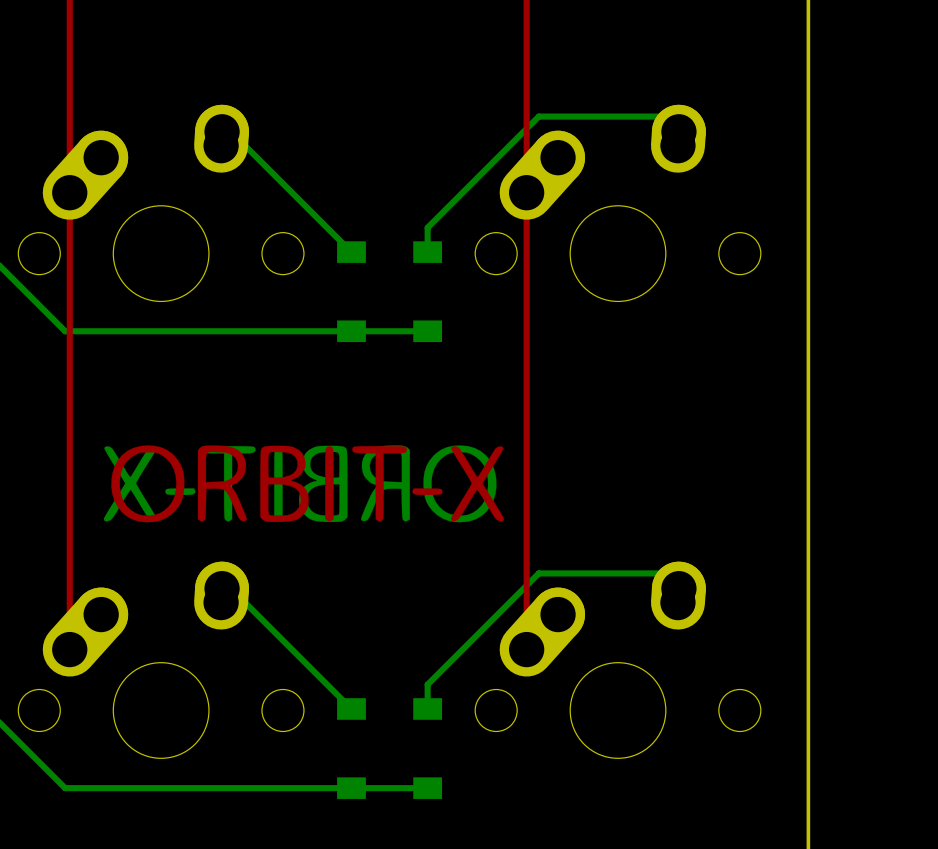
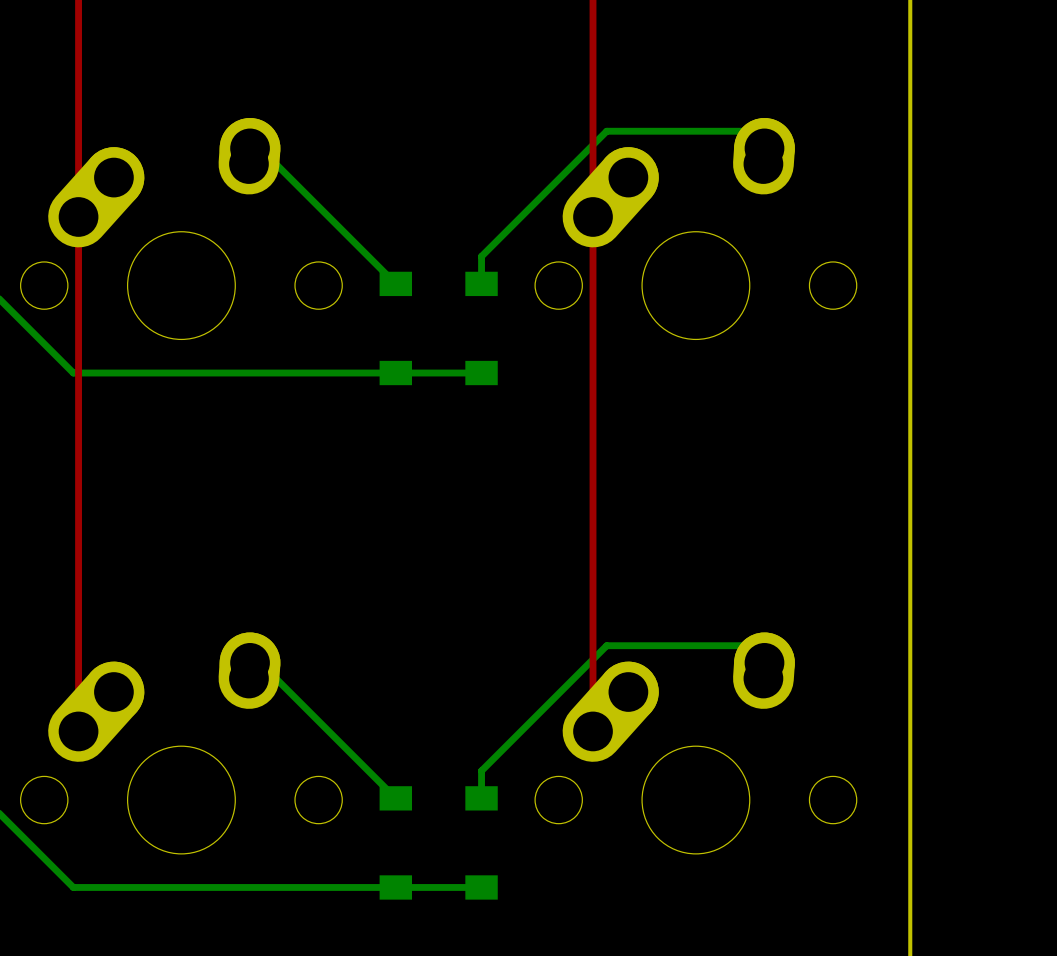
drawing: [103, 445, 504, 523] -> none

